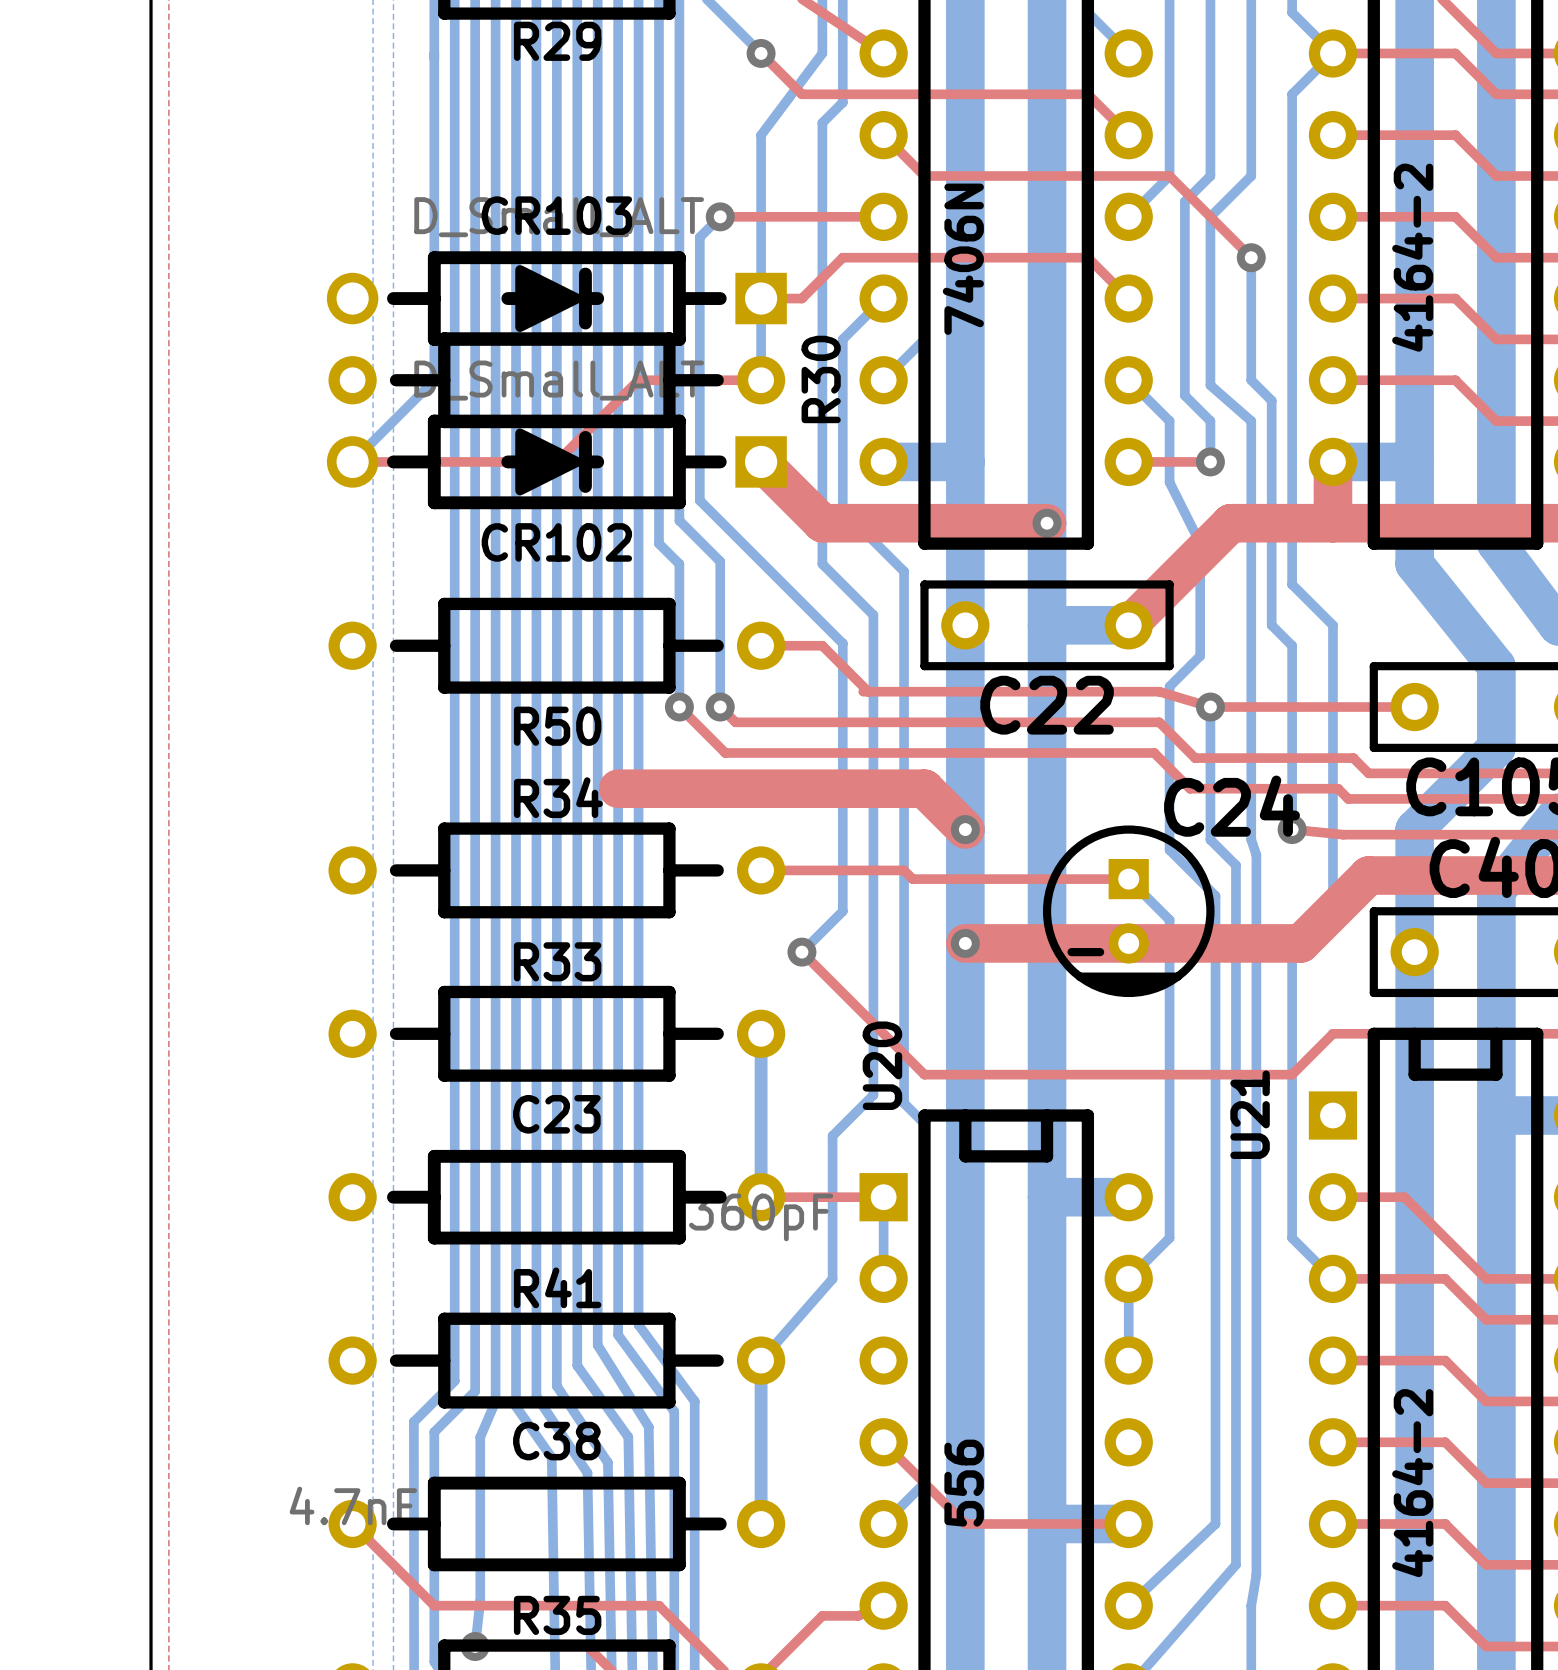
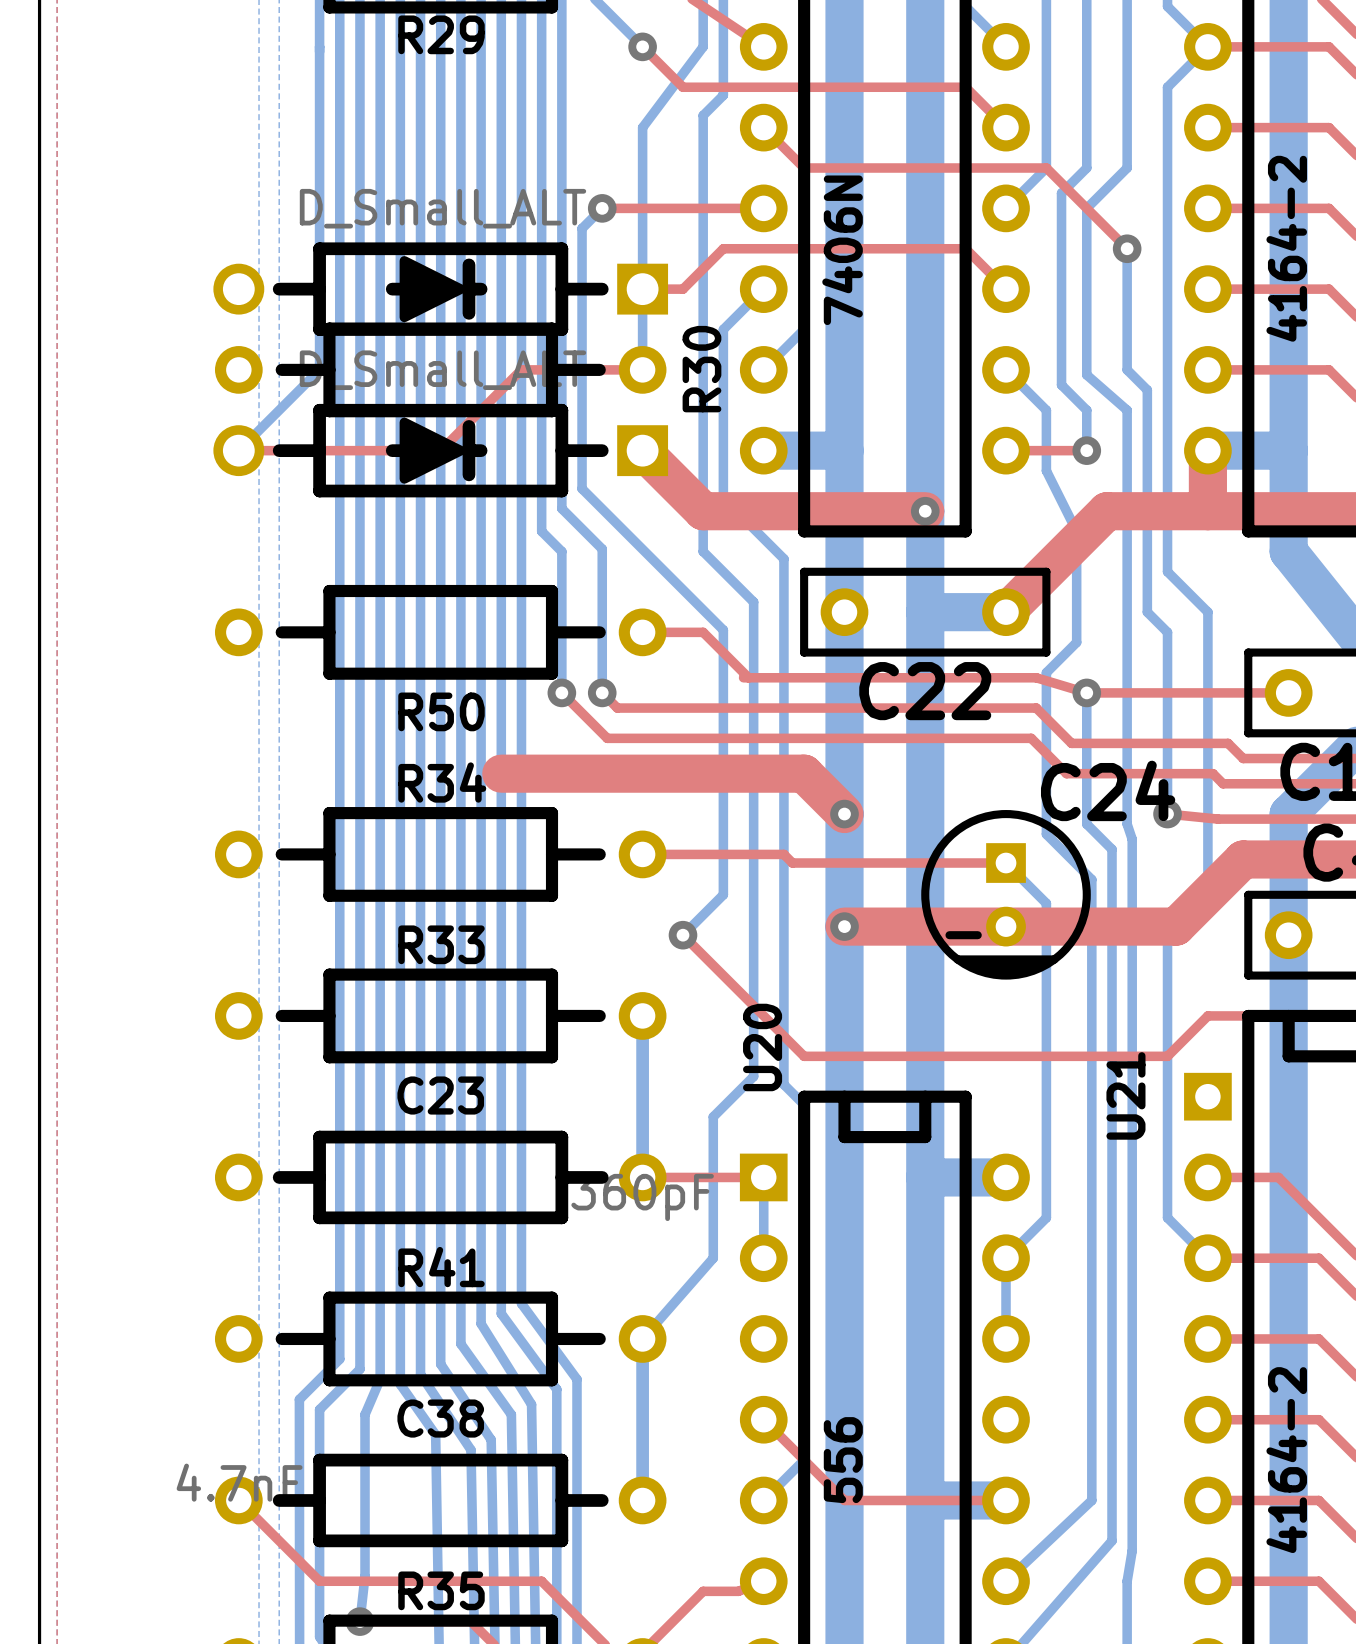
CR103 name: CR103 (556, 215) -> none
CR102 name: CR102 (556, 542) -> none

